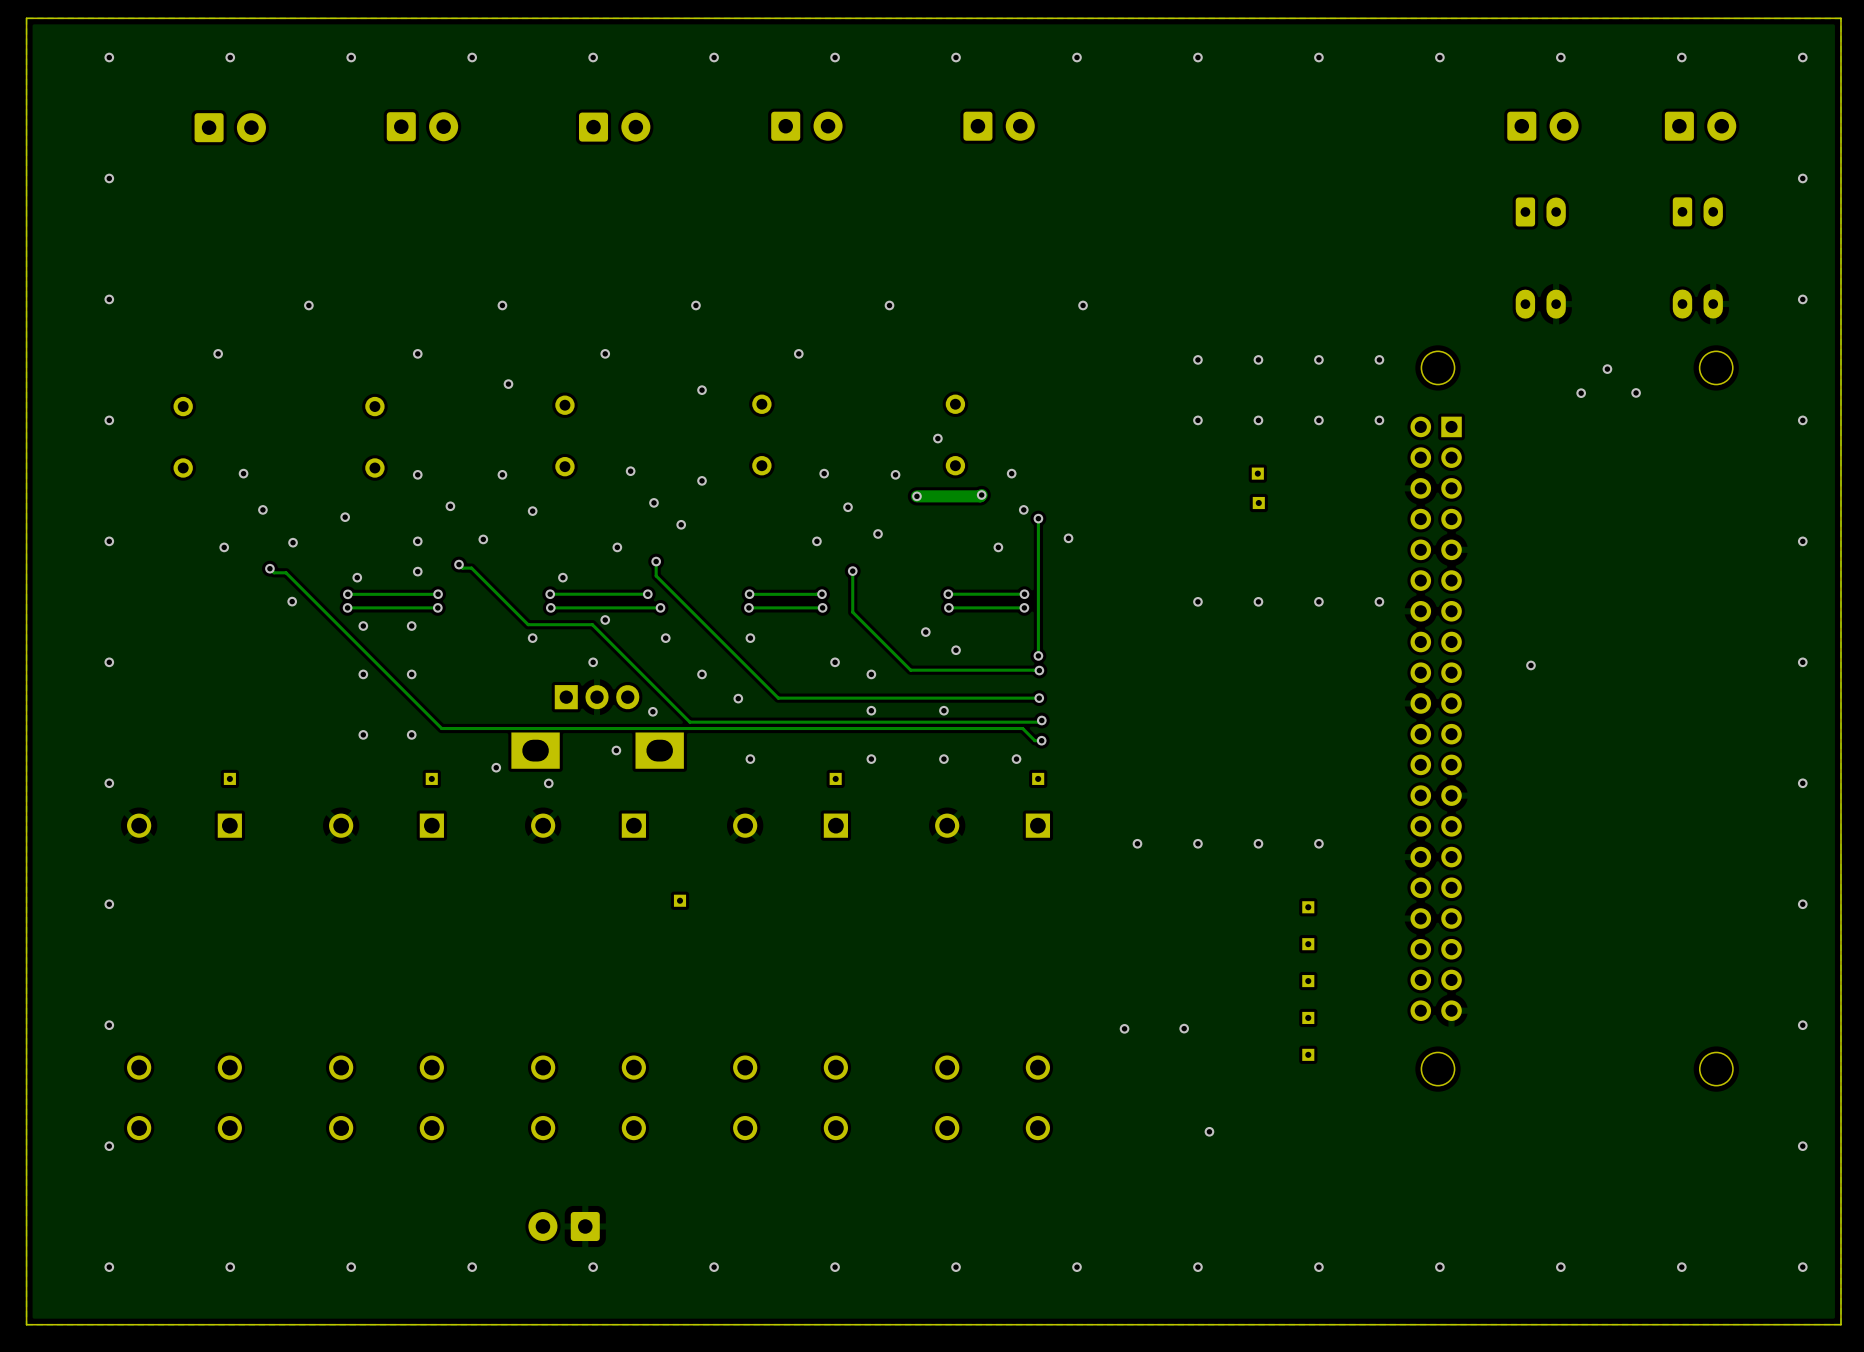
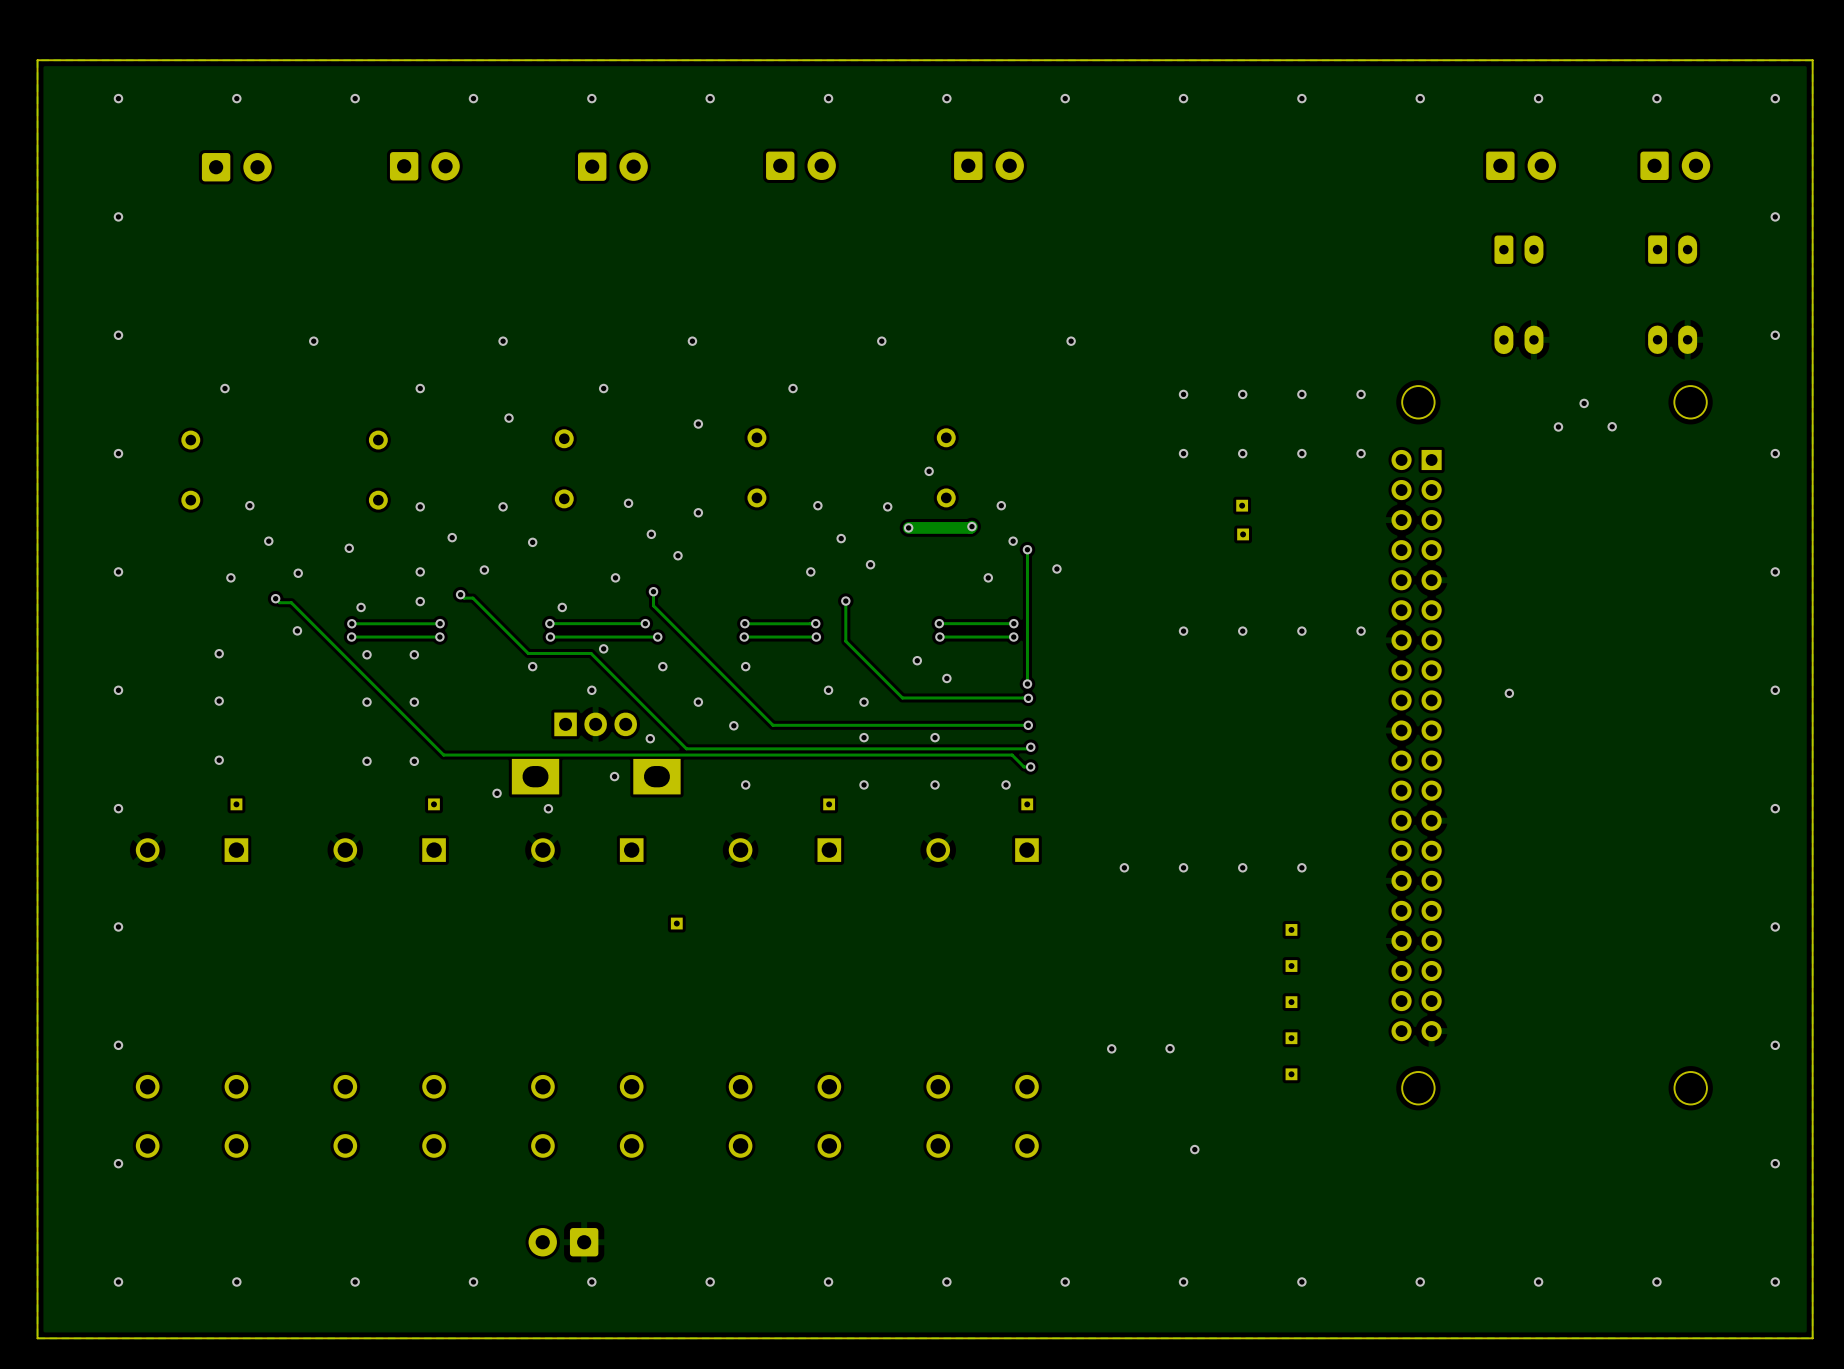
via: none -> (219, 653)
via: none -> (219, 701)
via: none -> (219, 760)

